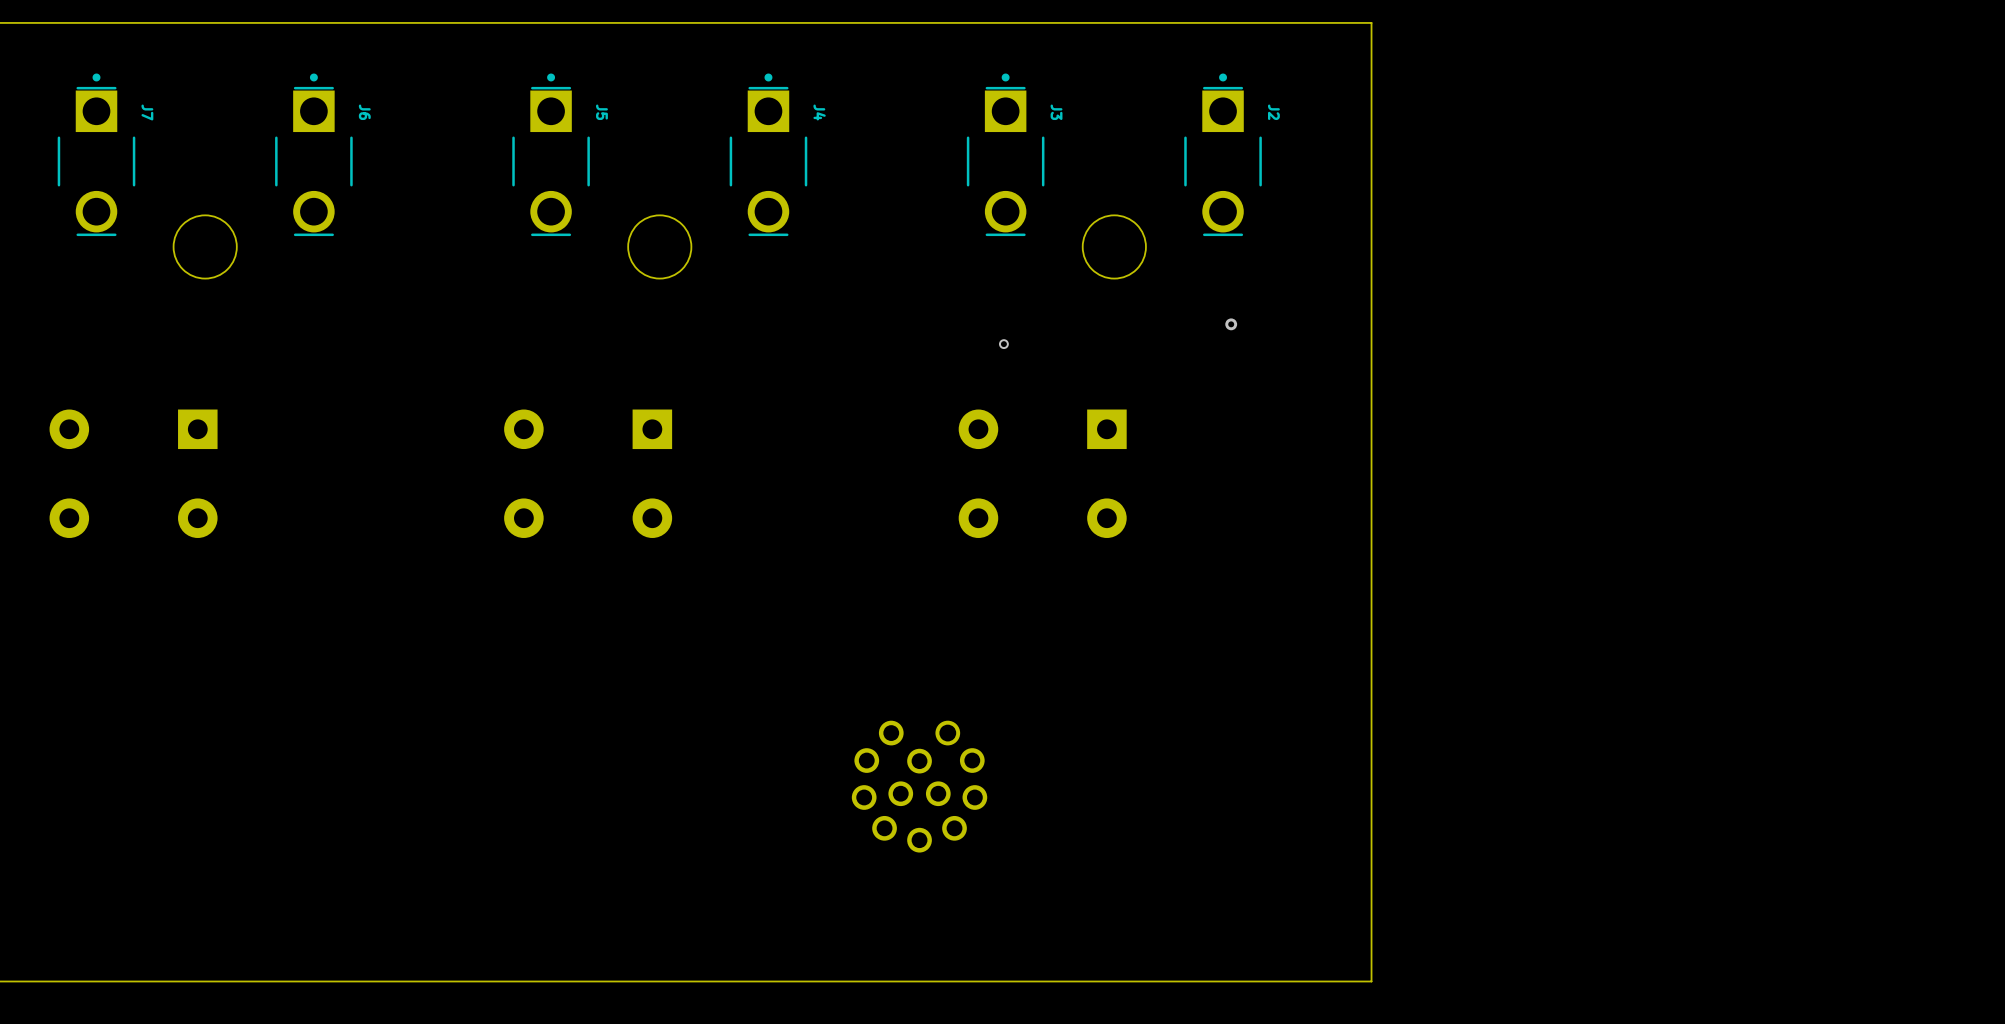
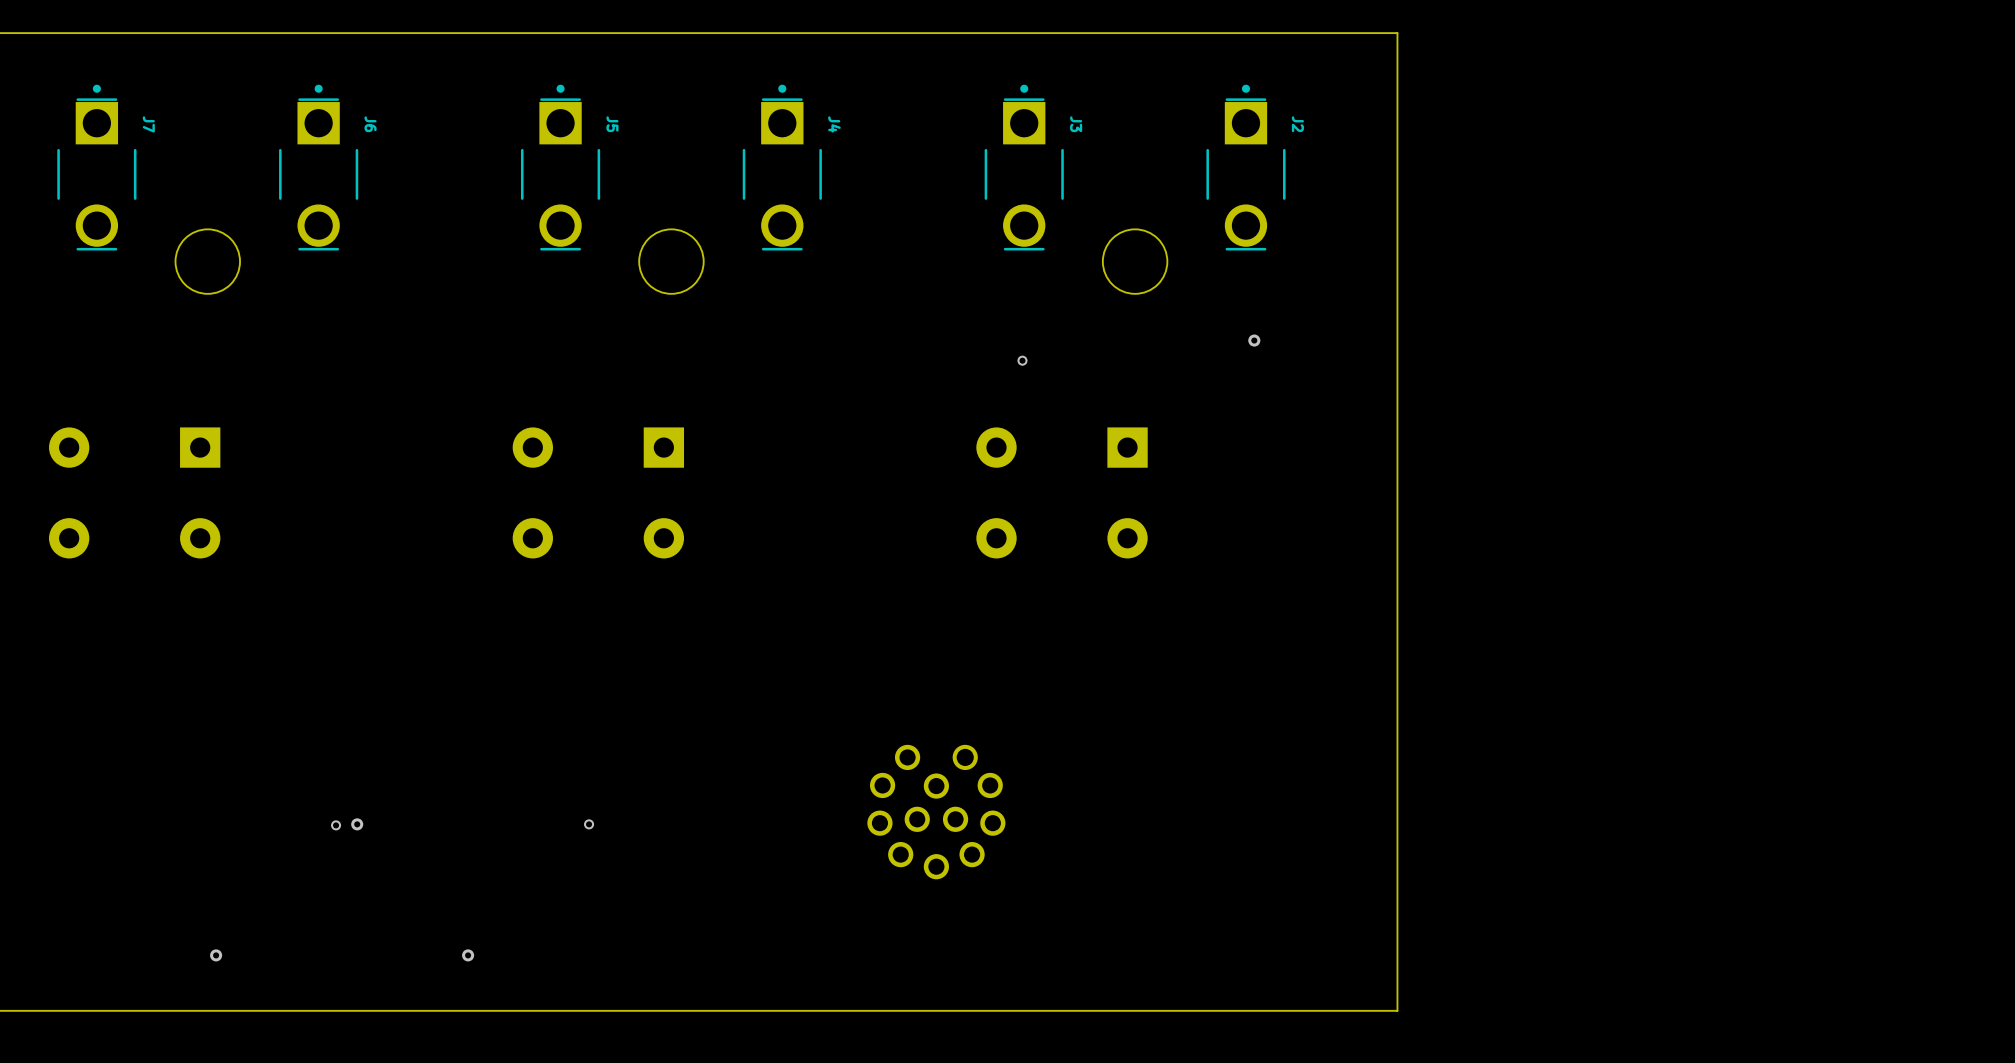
via: none -> (357, 824)
via: none -> (589, 824)
via: none -> (336, 825)
via: none -> (216, 955)
via: none -> (468, 955)

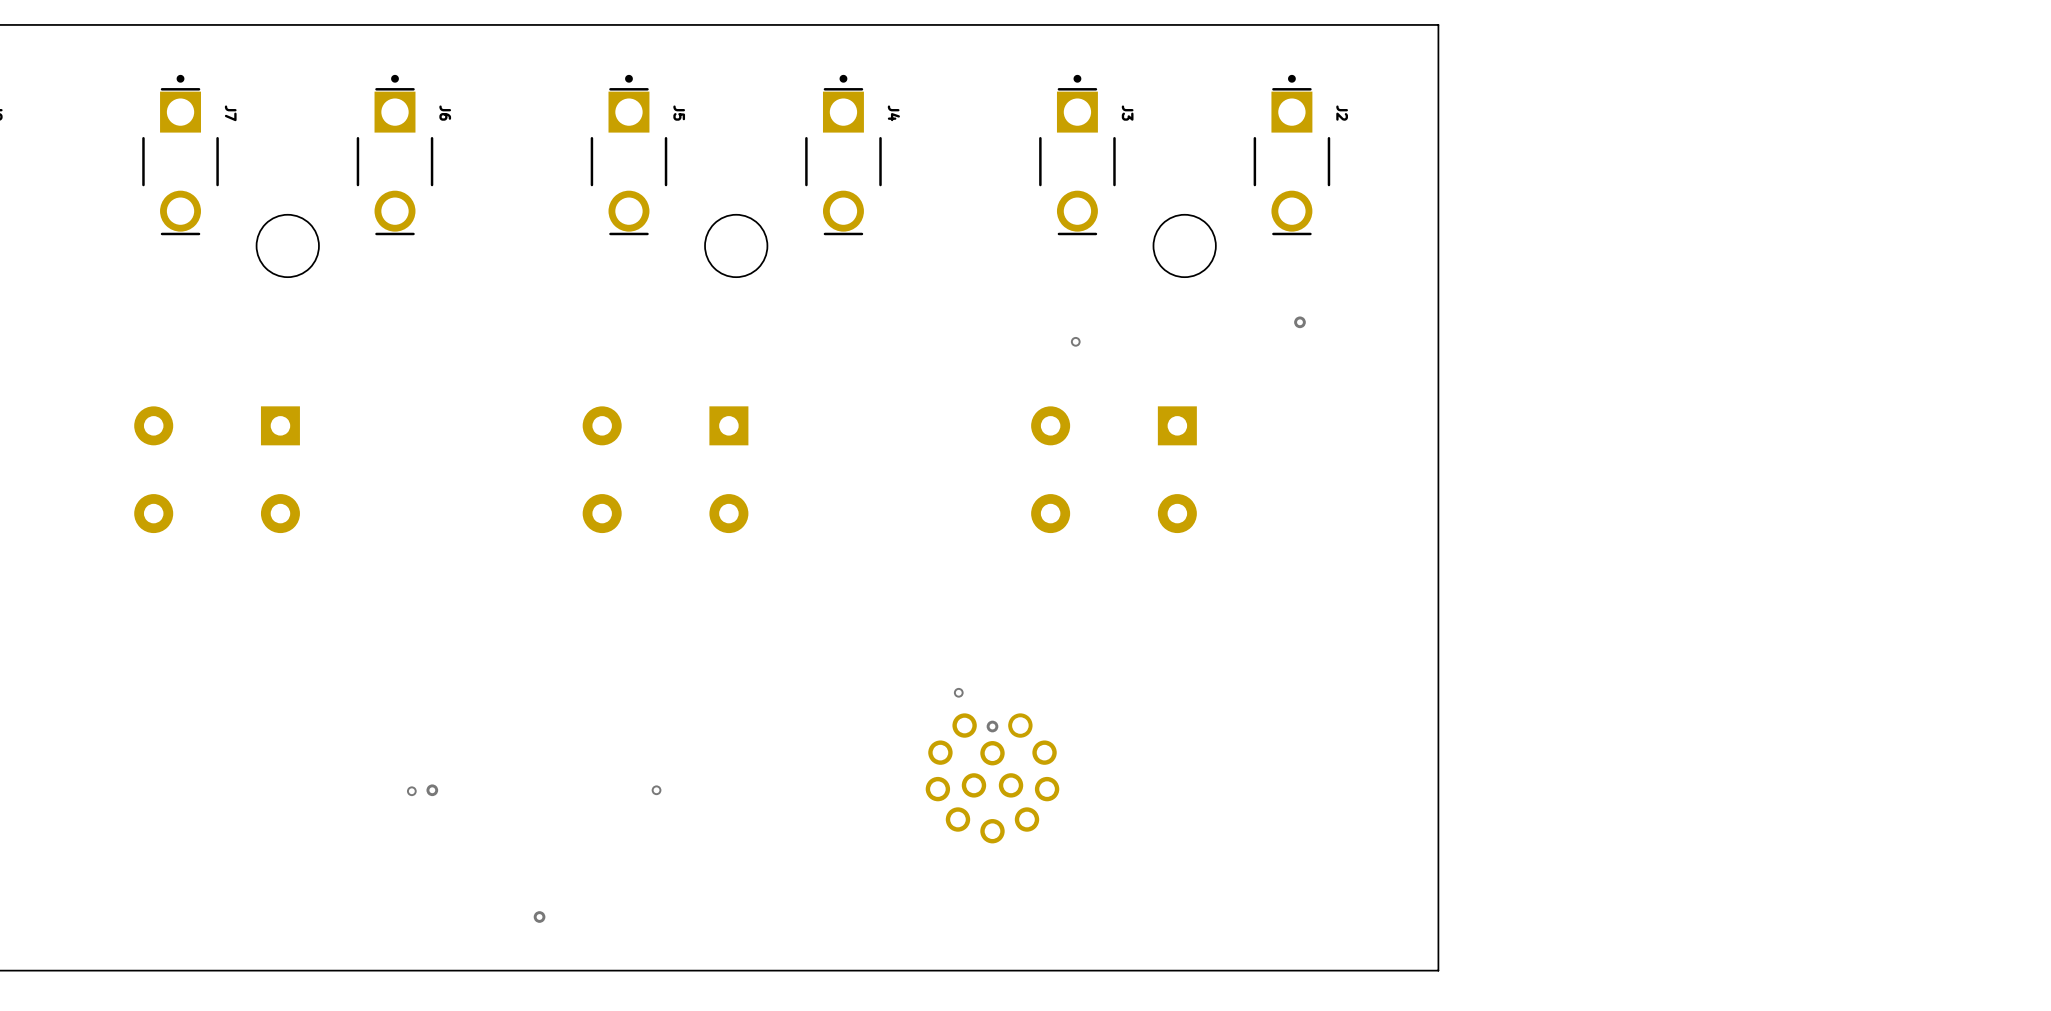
via: none -> (958, 692)
via: none -> (992, 726)
via: (216, 955) -> none

